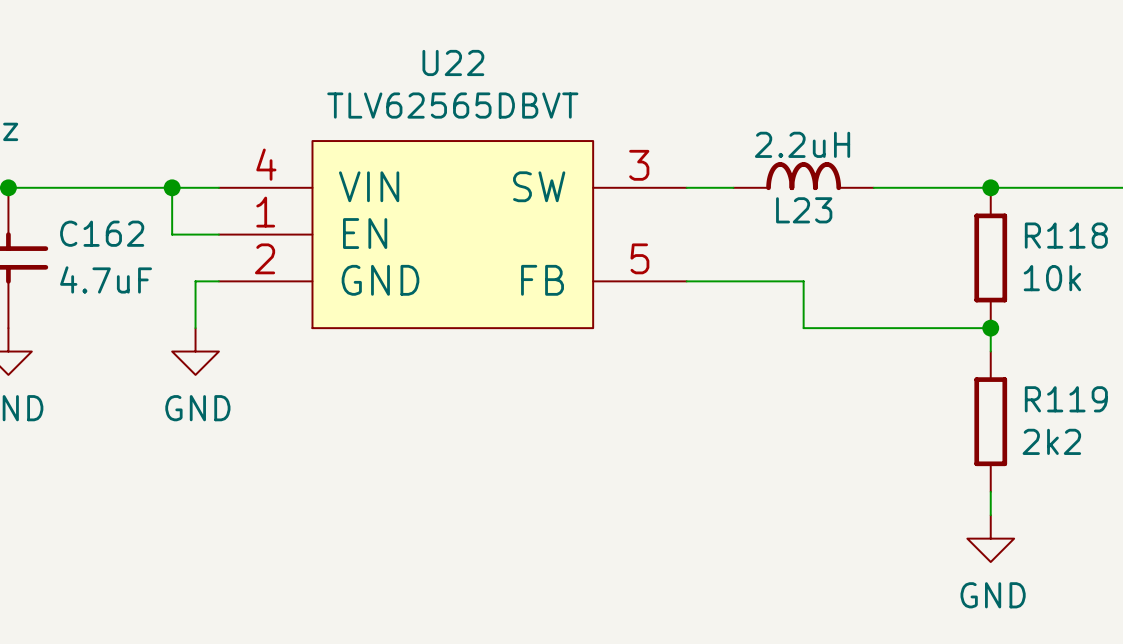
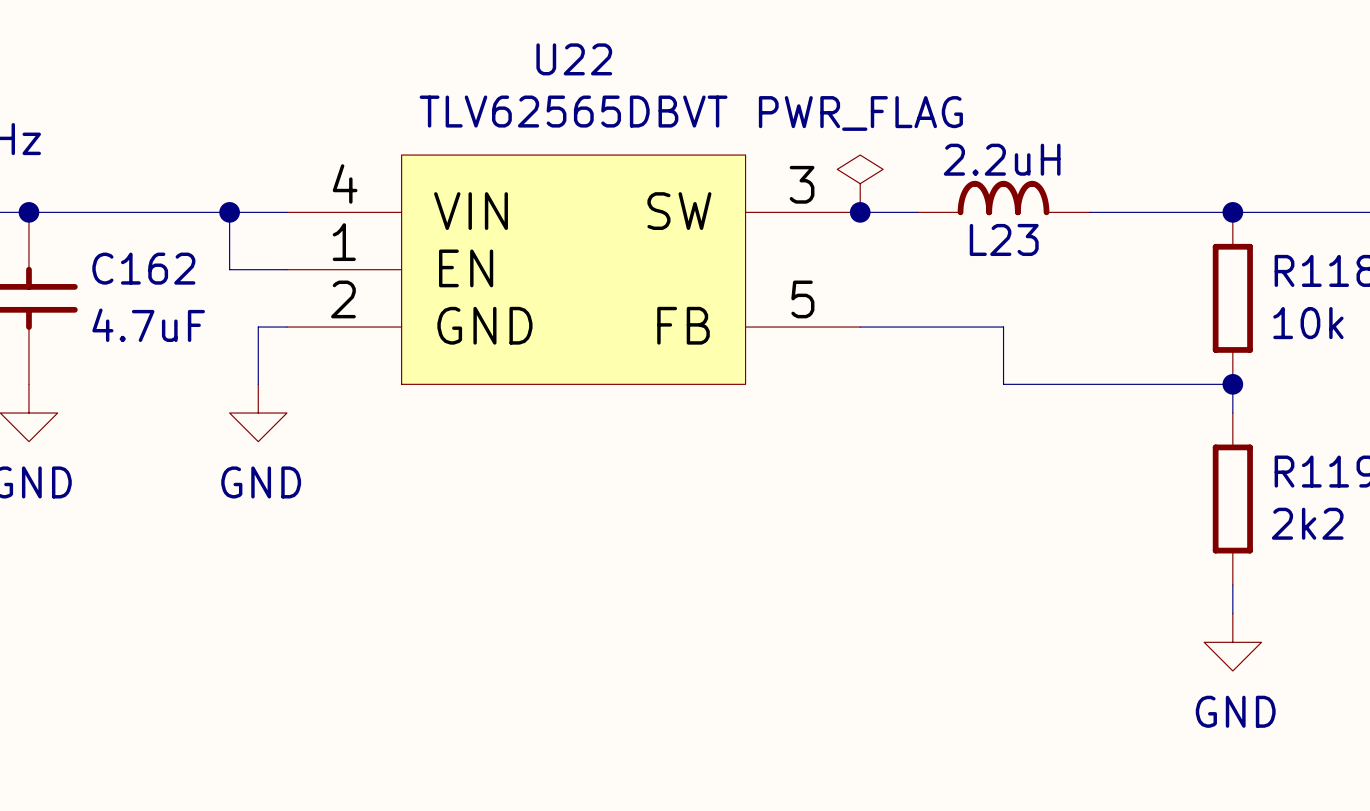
power symbol: none -> PWR_FLAG (860, 183)
junction: none -> (860, 212)

